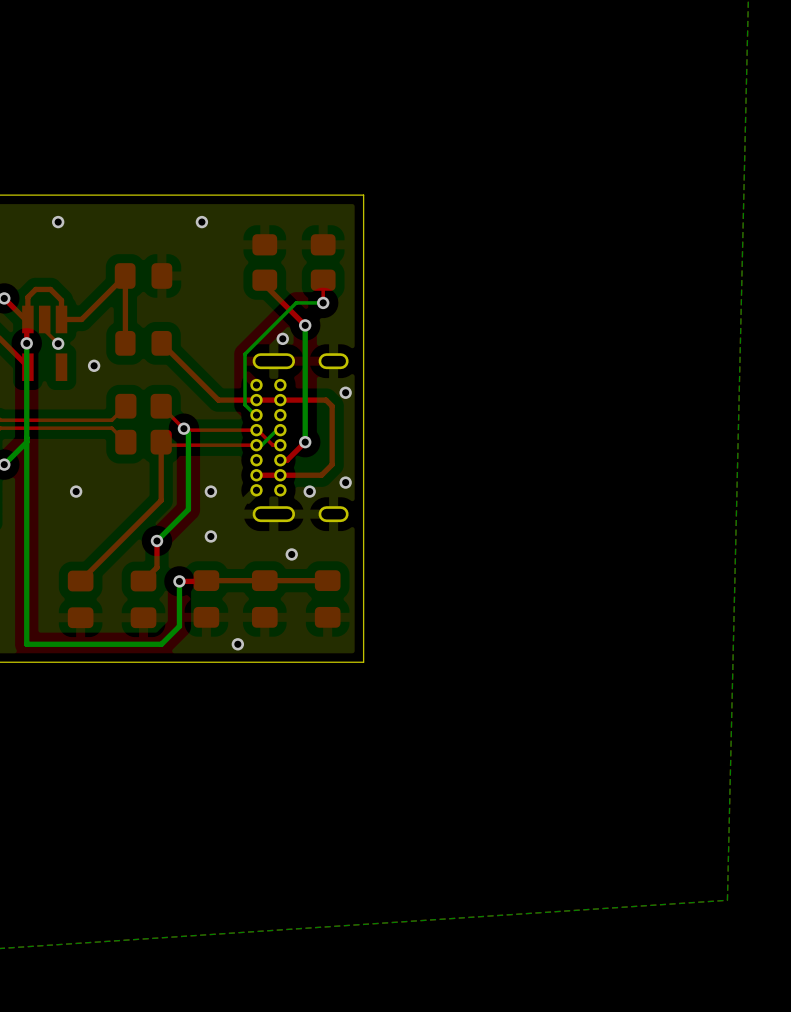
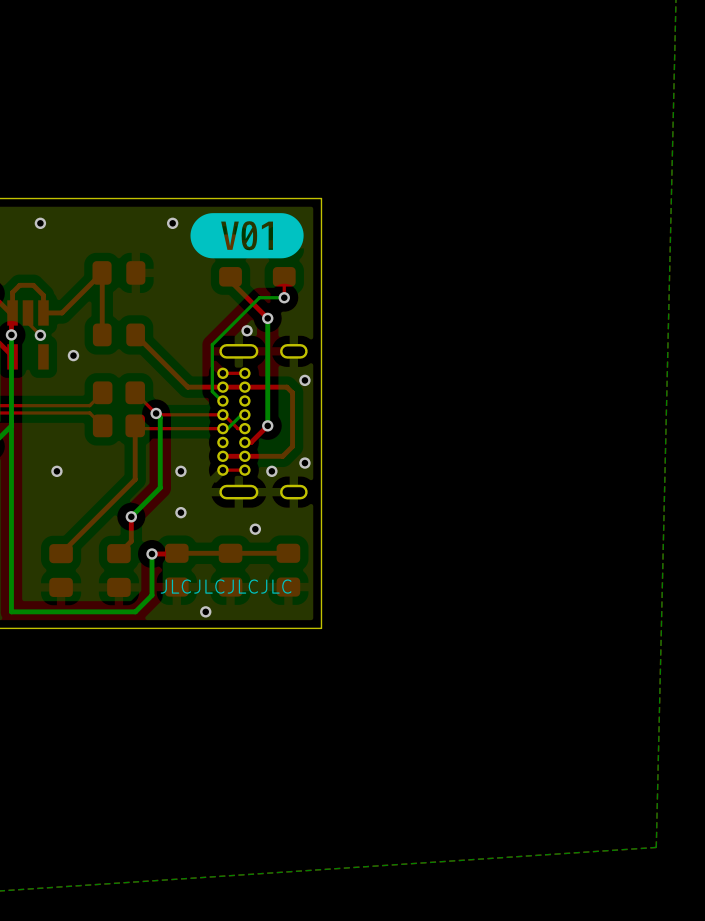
drawing: none -> [190, 213, 304, 259]
top track: none -> (244, 373) (222, 373)
top track: none -> (244, 470) (222, 470)
text: none -> JLCJLCJLCJLC (226, 586)

